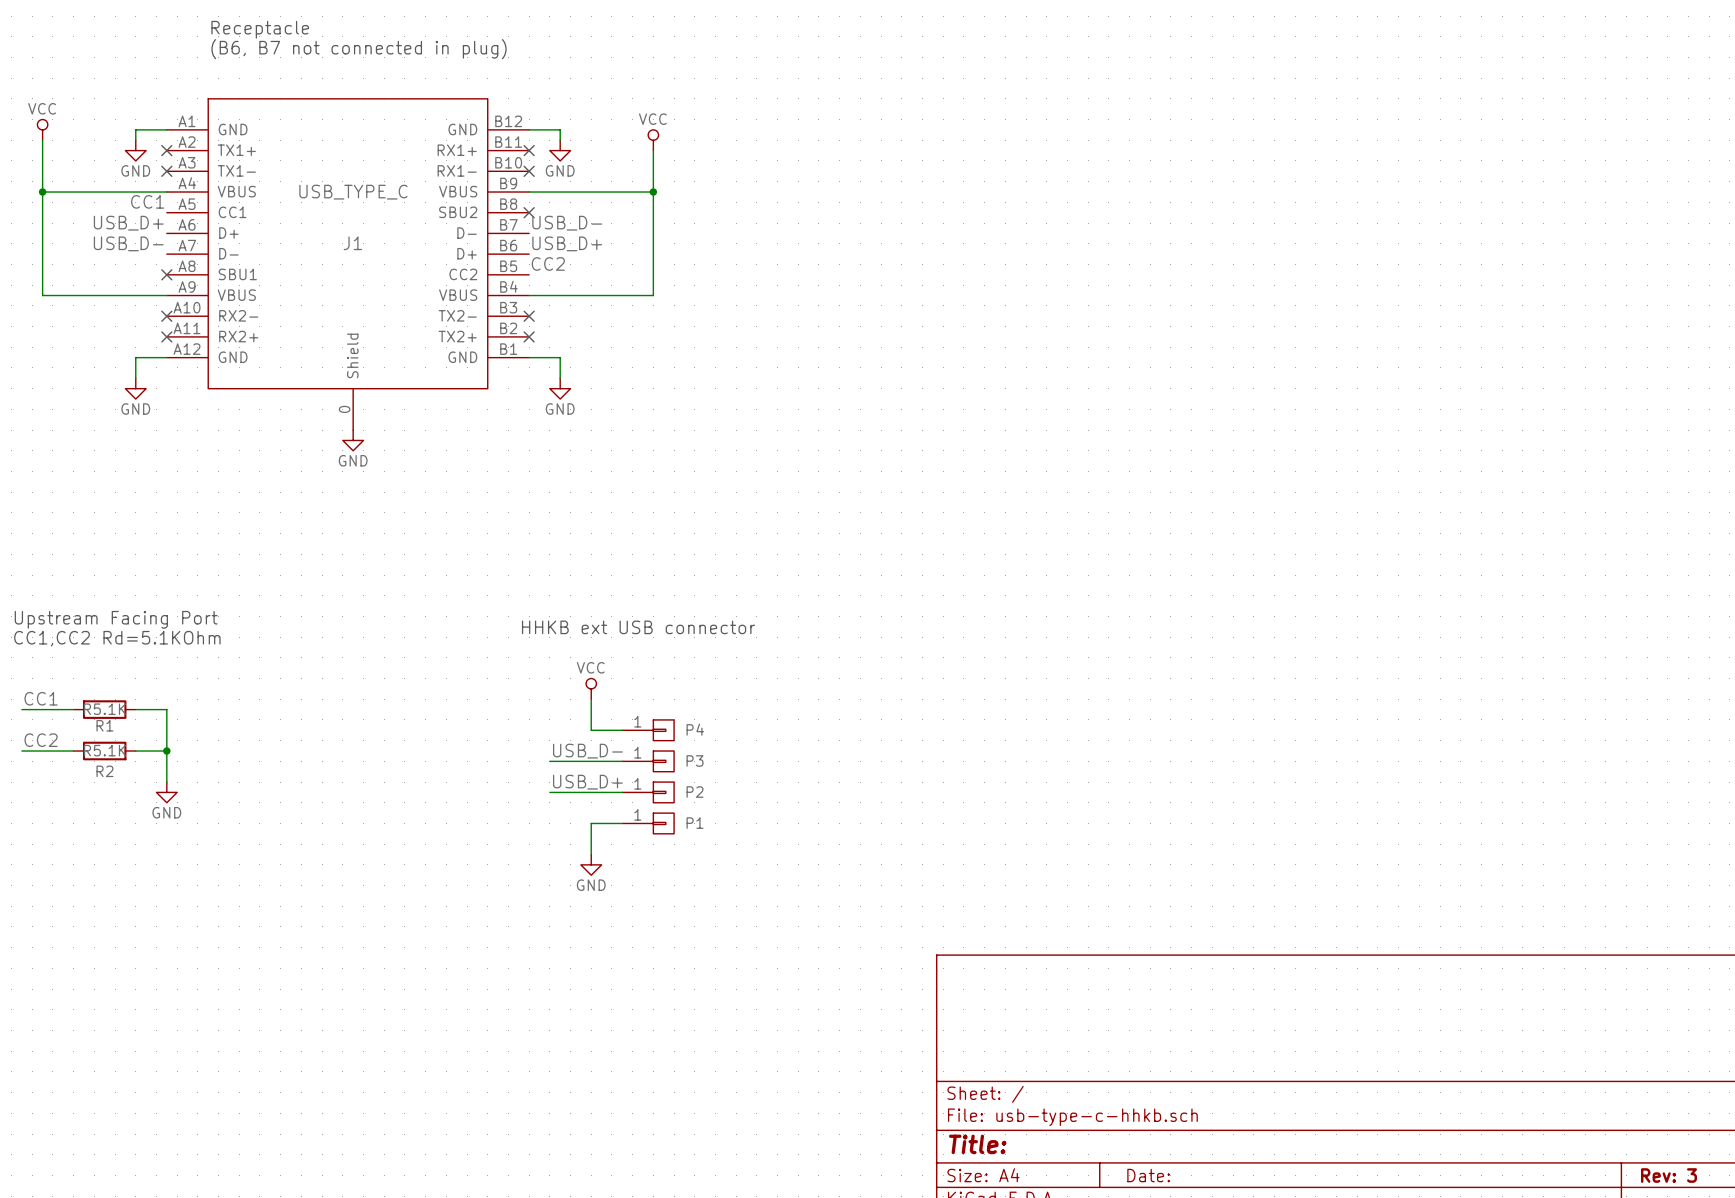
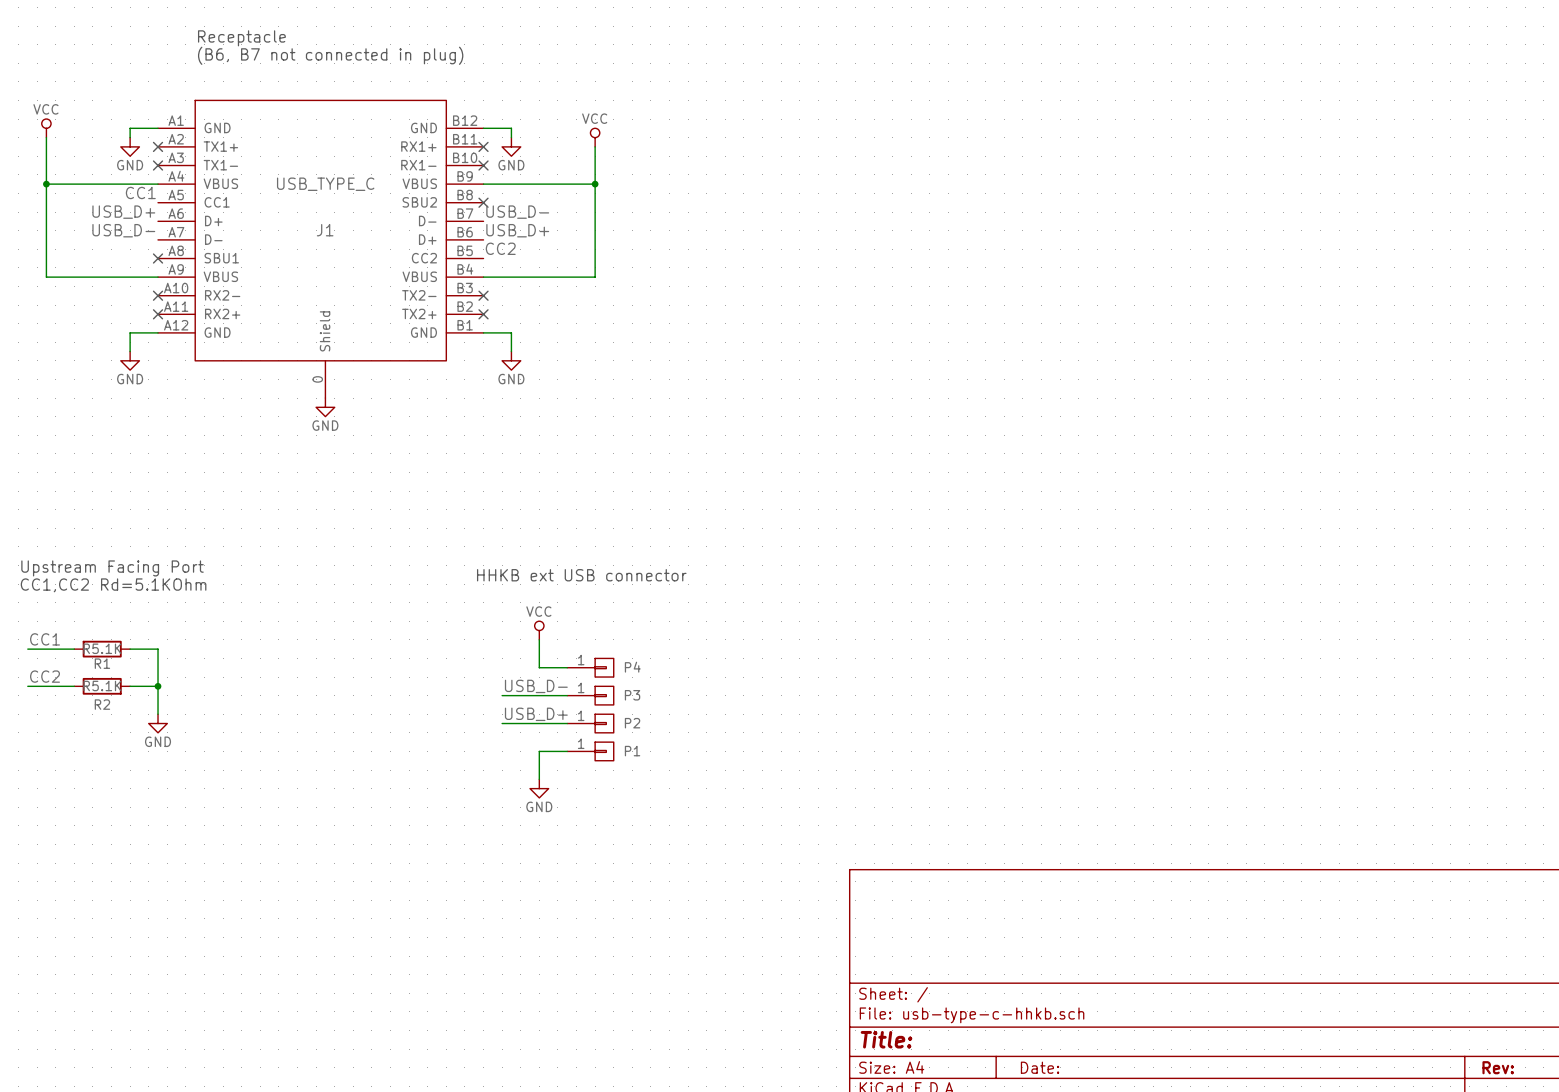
title block: Rev: 3 (1669, 1175) -> Rev: (1498, 1067)

